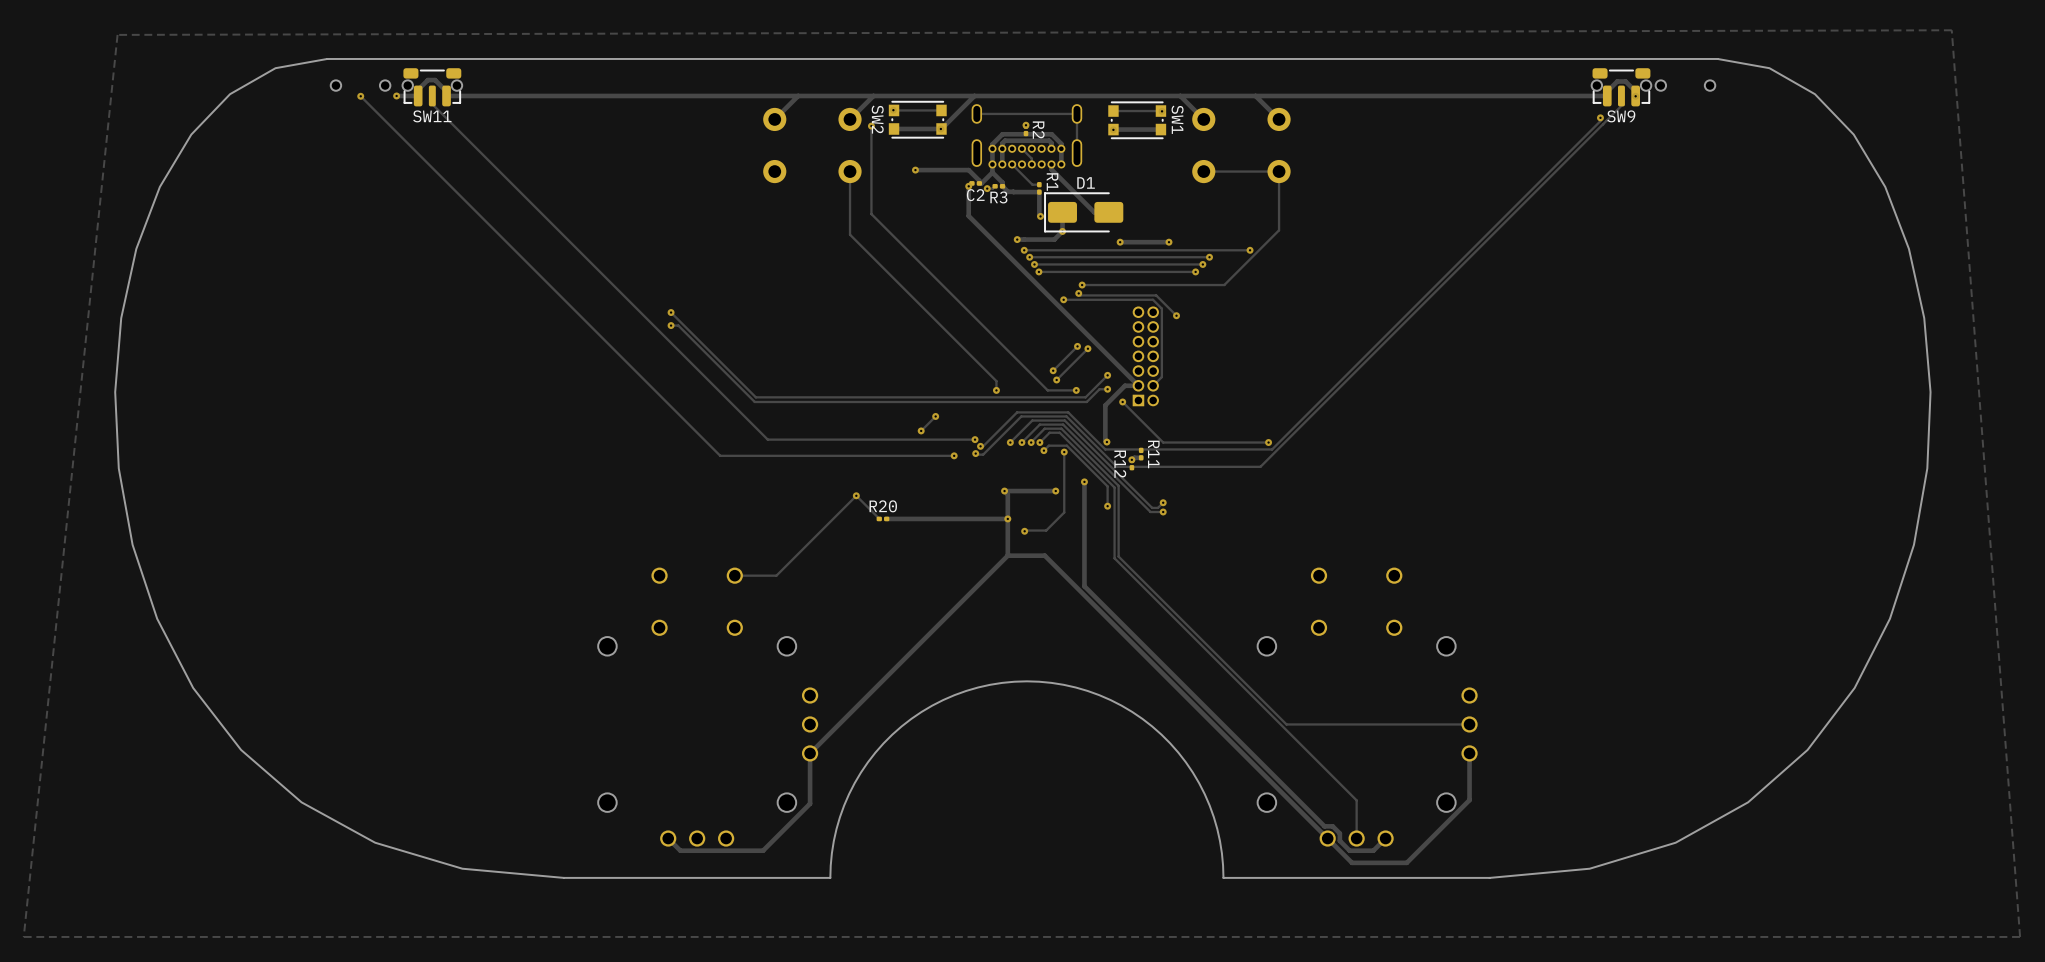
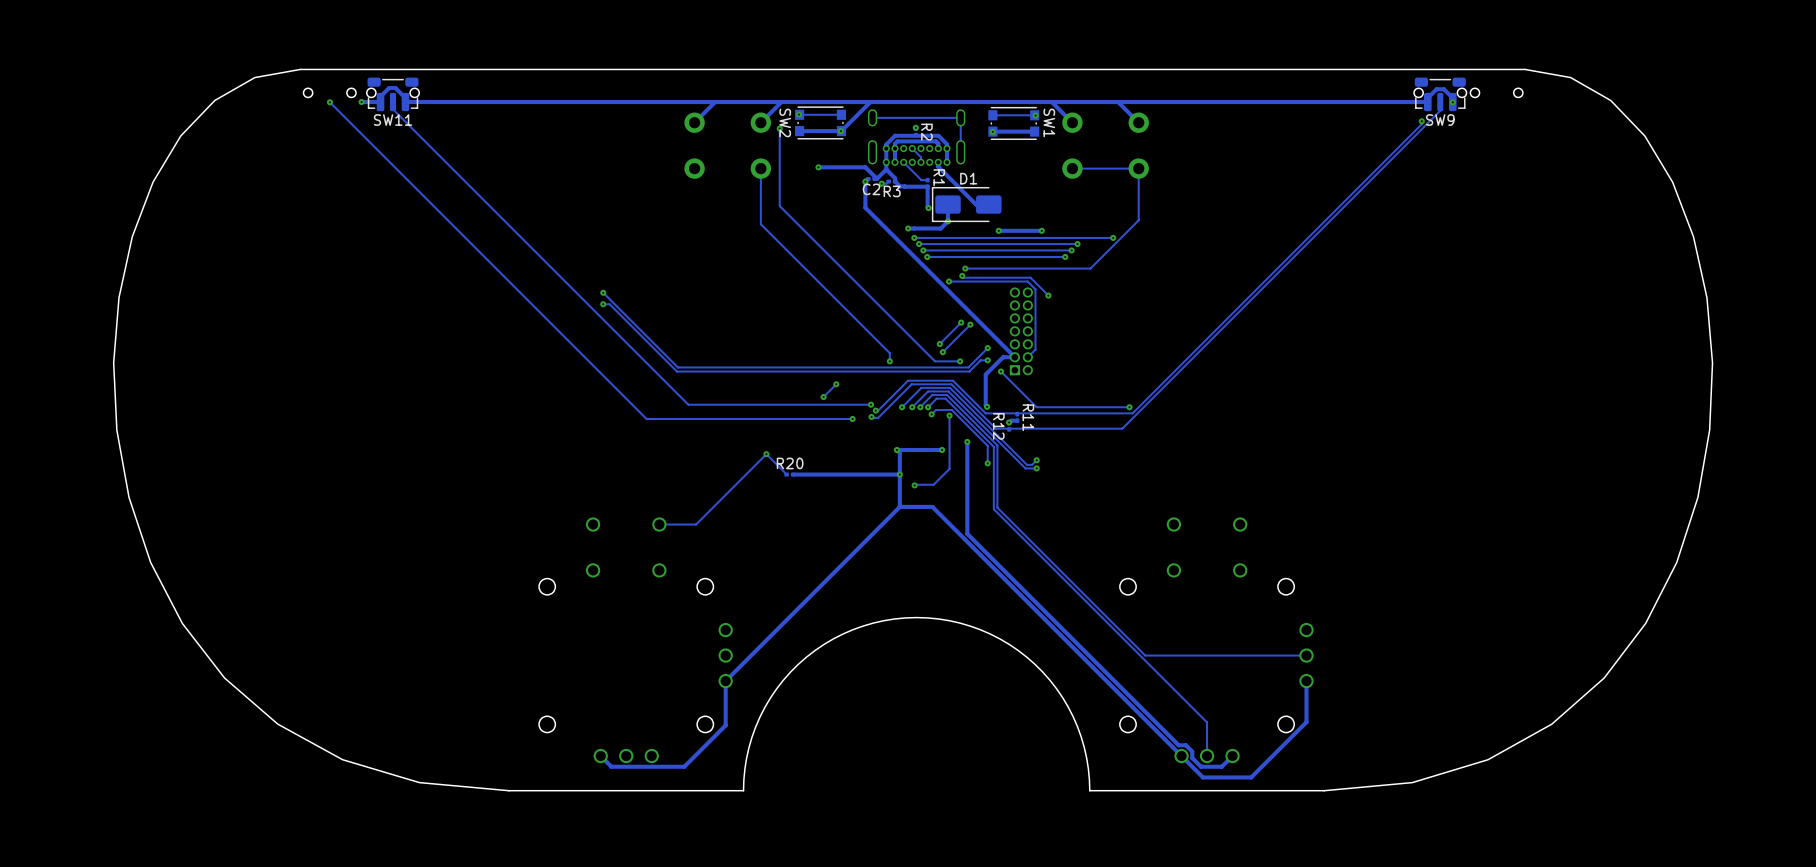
zone outline: (1951, 30) (117, 34) (23, 936) (2020, 936) (1951, 30) -> none

